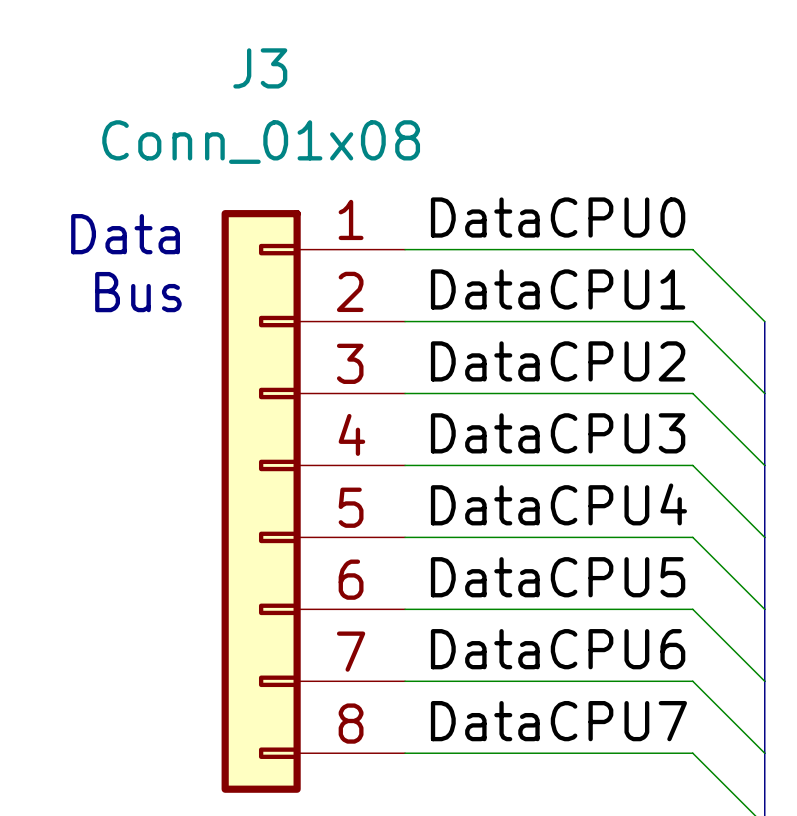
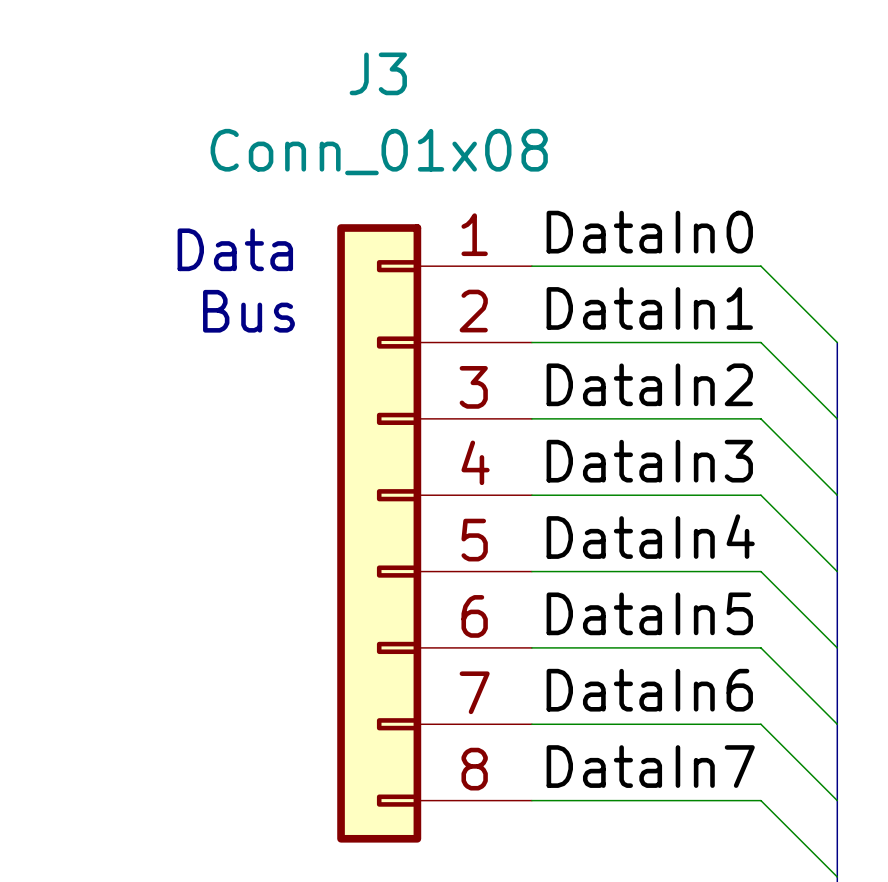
label: DataCPU0 (558, 217) -> DataIn0 (649, 232)
text position: Data (125, 234) -> Data (235, 249)
label: DataCPU1 (558, 289) -> DataIn1 (649, 308)
text position: Bus (138, 292) -> Bus (248, 311)
label: DataCPU2 (558, 361) -> DataIn2 (649, 384)
label: DataCPU3 (558, 433) -> DataIn3 (649, 461)
J3 position: (313, 501) -> (434, 533)
label: DataCPU4 (558, 504) -> DataIn4 (650, 536)
label: DataCPU5 (558, 577) -> DataIn5 (649, 613)
label: DataCPU6 (558, 649) -> DataIn6 (649, 690)
label: DataCPU7 (558, 721) -> DataIn7 (650, 766)

